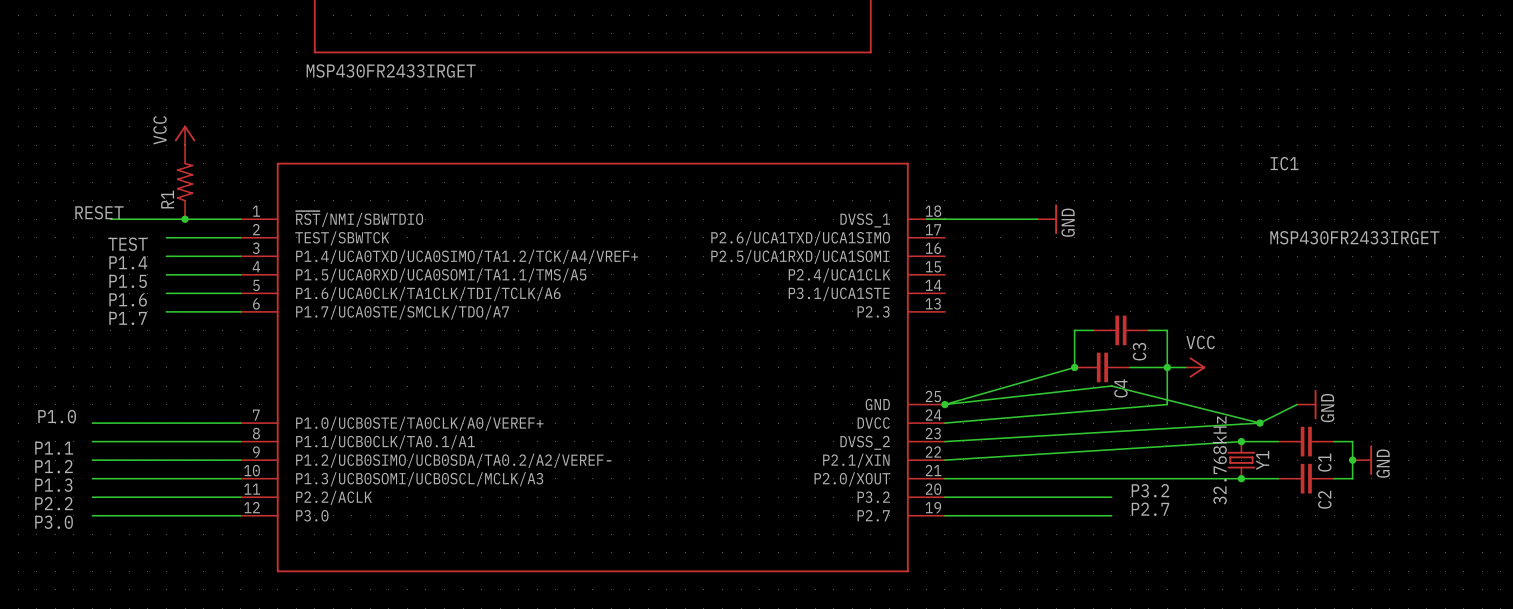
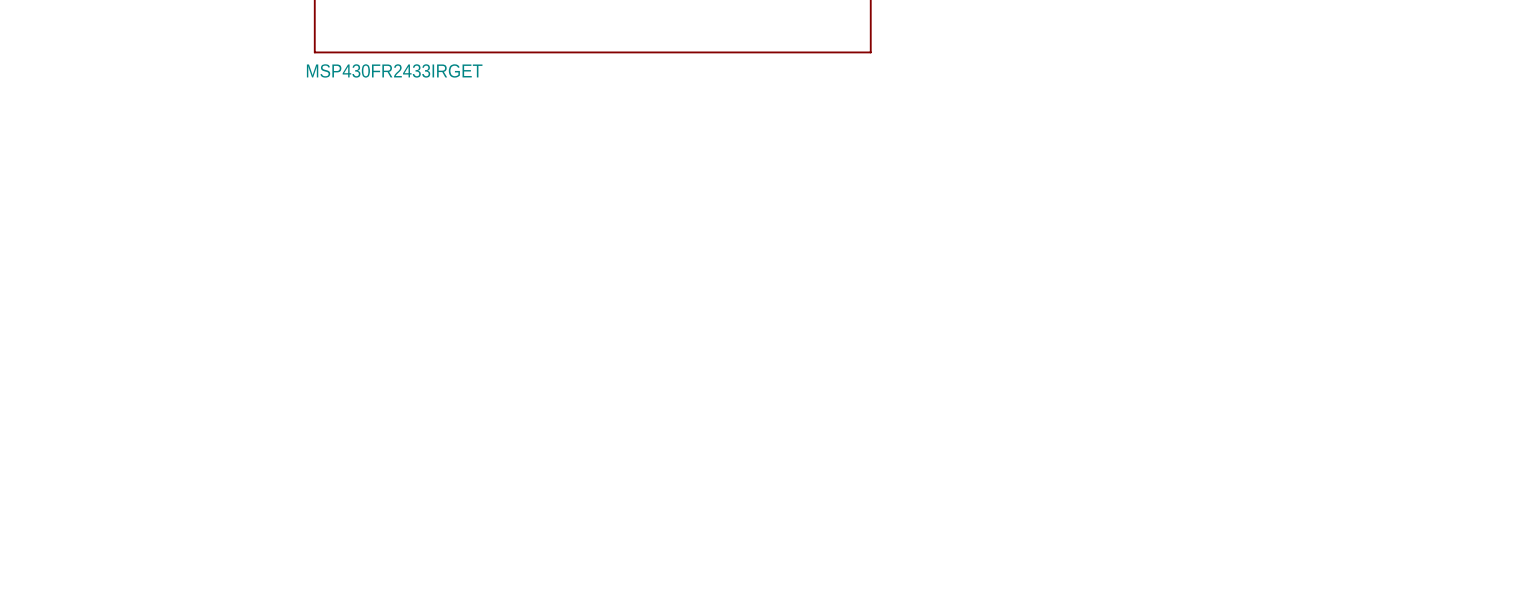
power symbol: VCC (185, 135) -> none
R1: (185, 182) -> none
label: RESET (99, 212) -> none
wire: (110, 219) (240, 219) -> none
junction: (185, 219) -> none
wire: (926, 219) (1037, 219) -> none
power symbol: GND (1047, 219) -> none
wire: (166, 237) (240, 237) -> none
label: TEST (127, 244) -> none
wire: (166, 256) (240, 256) -> none
label: P1.4 (128, 262) -> none
wire: (166, 274) (240, 274) -> none
label: P1.5 (128, 281) -> none
wire: (166, 293) (240, 293) -> none
label: P1.6 (128, 299) -> none
wire: (166, 311) (240, 311) -> none
label: P1.7 (128, 318) -> none
wire: (1093, 330) (1074, 330) (1074, 367) (944, 404) (1111, 386) (1259, 423) -> none
C3: (1120, 330) -> none
wire: (1148, 330) (1167, 330) (1167, 404) (944, 423) -> none
IC1: MSP430FR2433IRGET (592, 367) -> none
junction: (1074, 367) -> none
C4: (1102, 367) -> none
wire: (1130, 367) (1185, 367) -> none
junction: (1167, 367) -> none
power symbol: VCC (1195, 367) -> none
junction: (944, 404) -> none
wire: (1297, 404) (1259, 423) -> none
power symbol: GND (1306, 404) -> none
label: P1.0 (57, 416) -> none
wire: (92, 423) (240, 423) -> none
wire: (1259, 423) (944, 441) -> none
junction: (1259, 423) -> none
wire: (92, 441) (240, 441) -> none
junction: (1241, 441) -> none
wire: (1278, 441) (1241, 441) (944, 460) -> none
C1: (1306, 441) -> none
wire: (1334, 441) (1352, 441) (1352, 478) (1334, 478) -> none
label: P1.1 (54, 448) -> none
wire: (92, 460) (240, 460) -> none
Y1: 32.768kHz (1241, 460) -> none
junction: (1352, 460) -> none
power symbol: GND (1362, 460) -> none
label: P1.2 (54, 466) -> none
wire: (92, 478) (240, 478) -> none
wire: (944, 478) (1278, 478) -> none
junction: (1241, 478) -> none
C2: (1306, 478) -> none
label: P1.3 (53, 485) -> none
label: P3.2 (1150, 490) -> none
wire: (92, 497) (240, 497) -> none
wire: (944, 497) (1111, 497) -> none
label: P2.2 (54, 503) -> none
label: P2.7 (1150, 509) -> none
wire: (92, 515) (240, 515) -> none
wire: (944, 515) (1111, 515) -> none
label: P3.0 (54, 522) -> none

